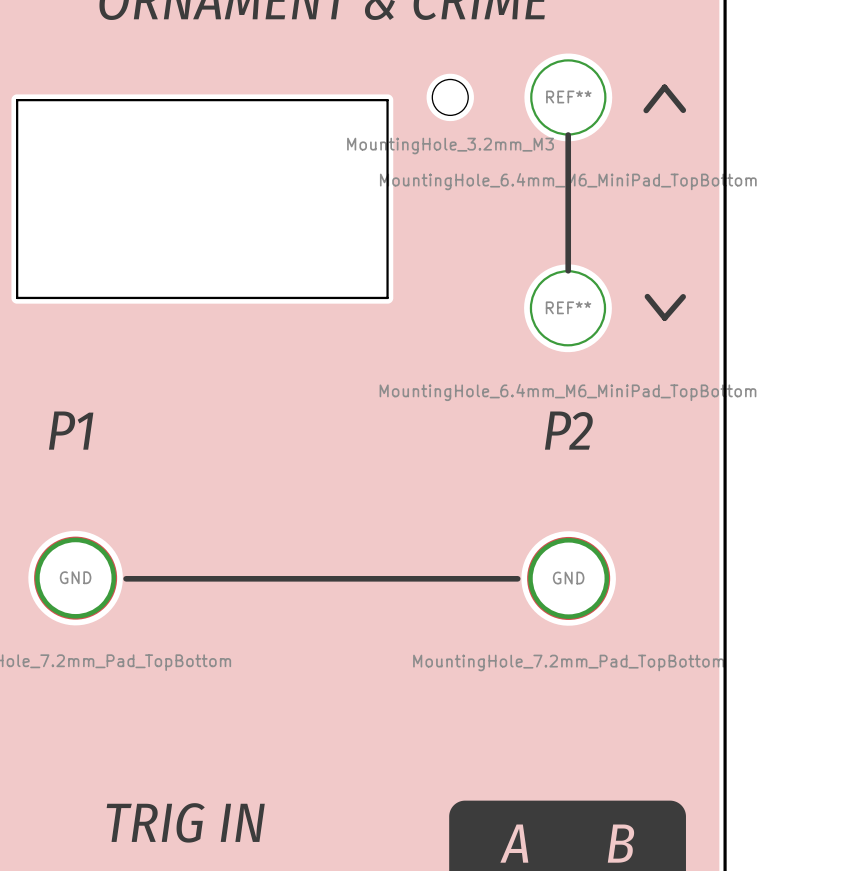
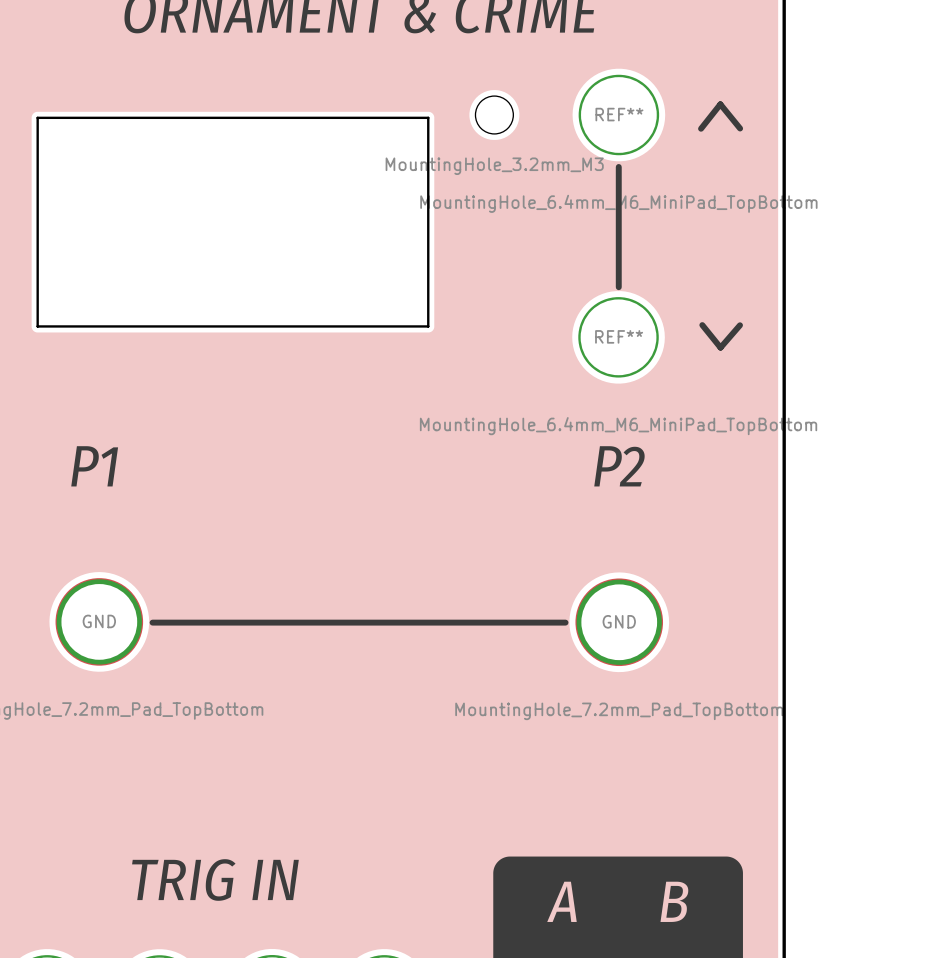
line: (568, 135) (568, 146) -> none
line: (568, 260) (568, 270) -> none

